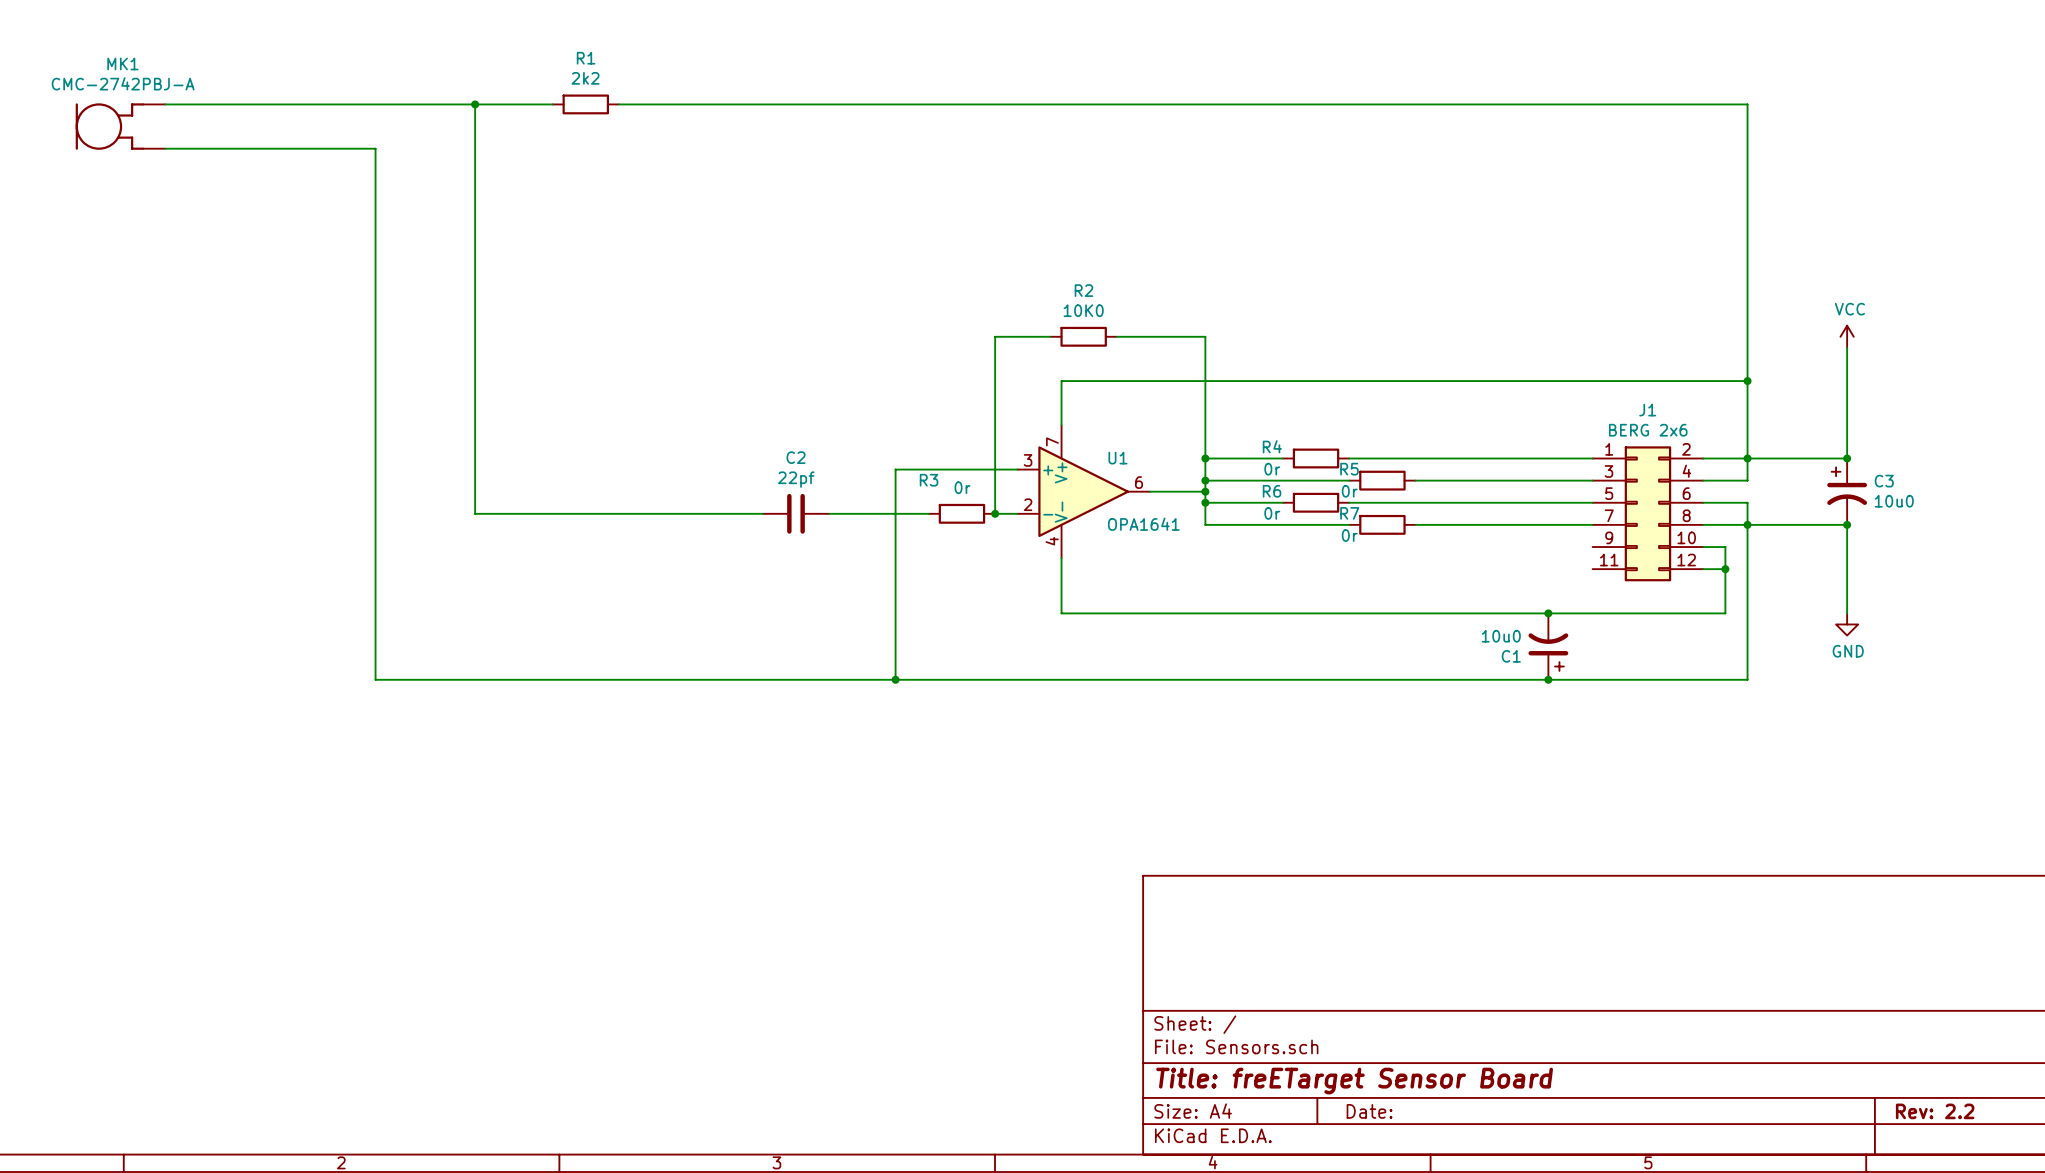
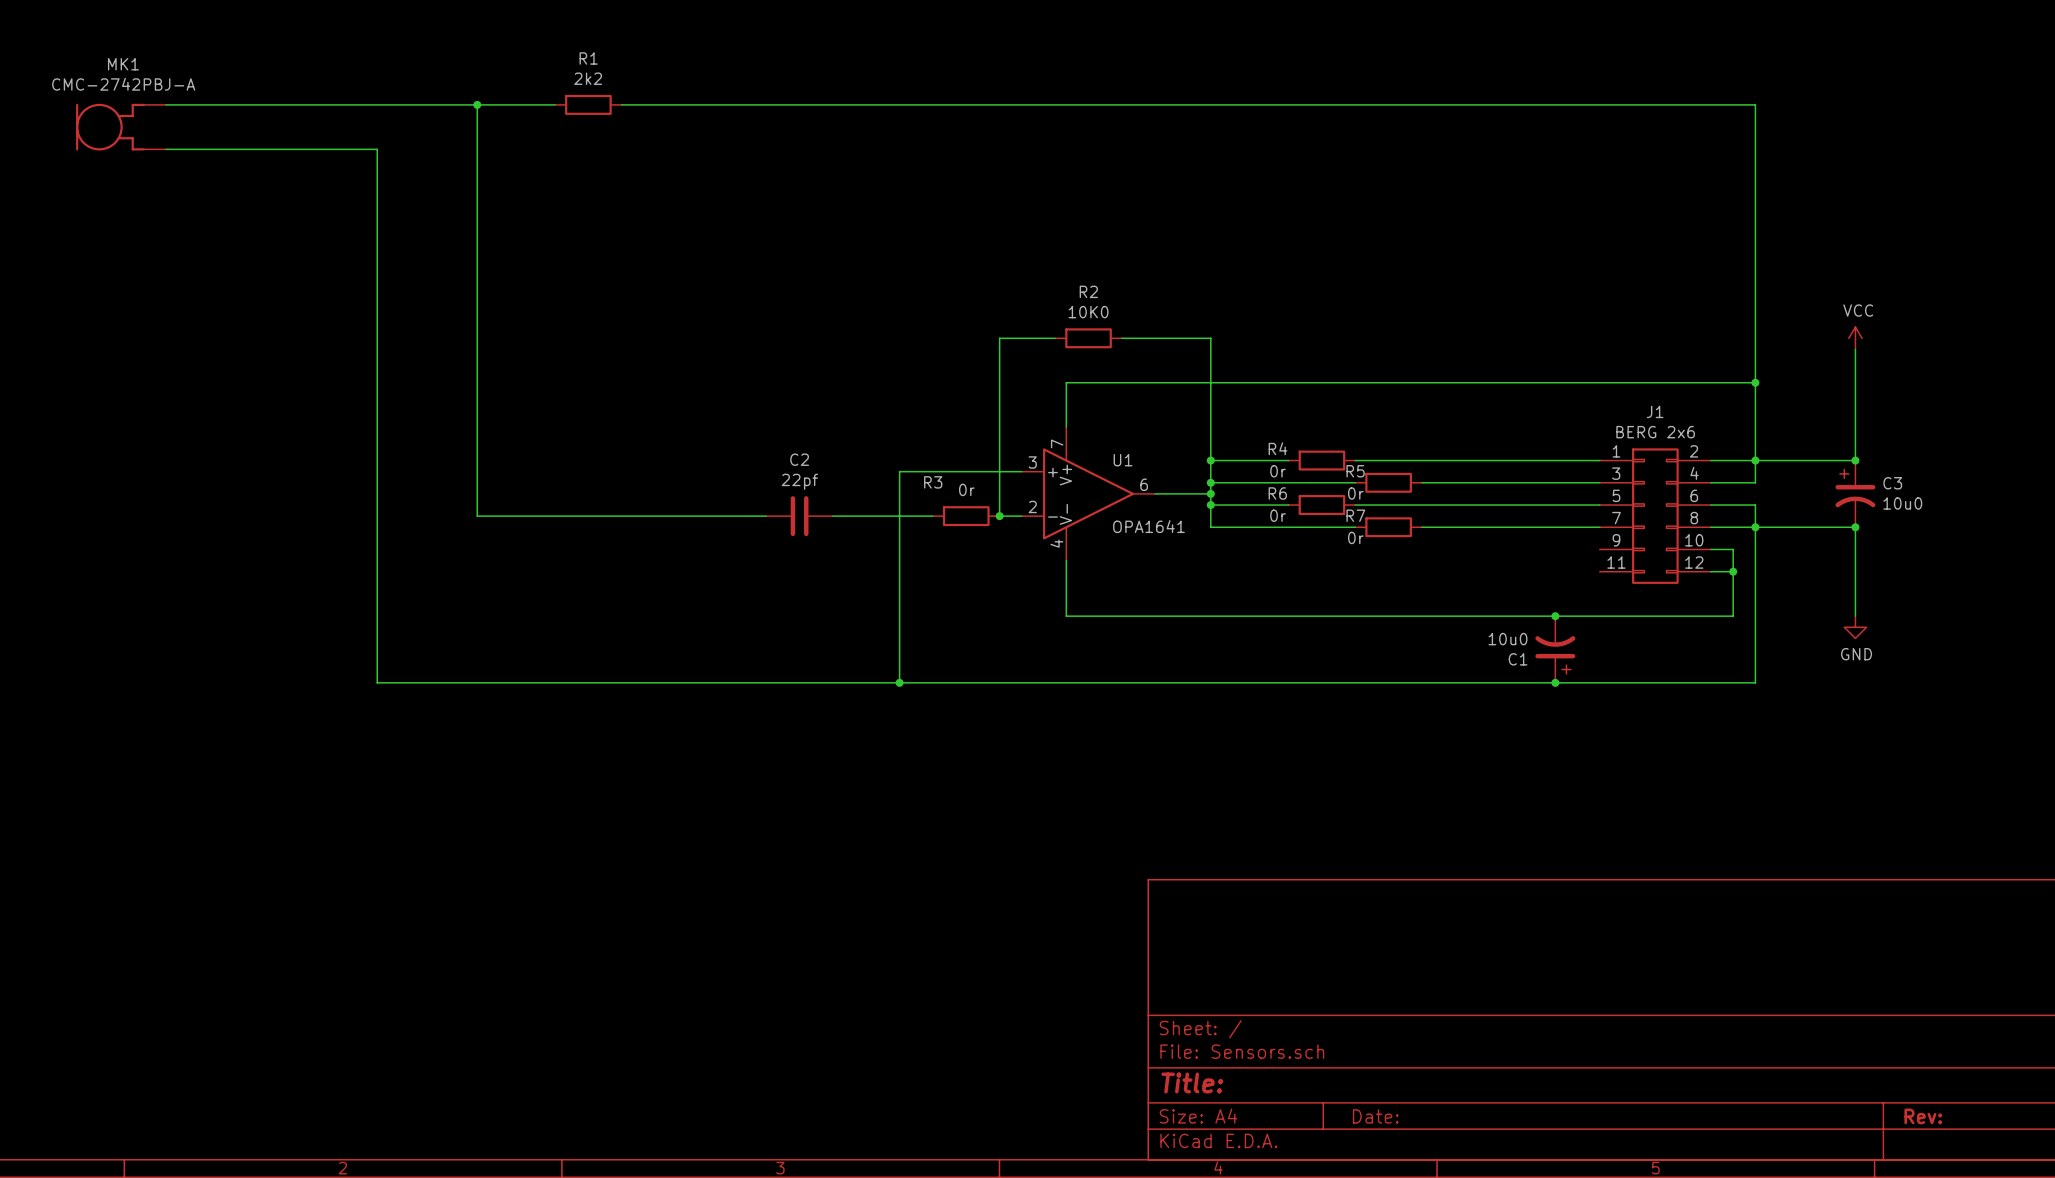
title block: Title: freETarget Sensor Board (1354, 1081) -> Title: (1192, 1082)
title block: Rev: 2.2 (1935, 1111) -> Rev: (1923, 1116)

